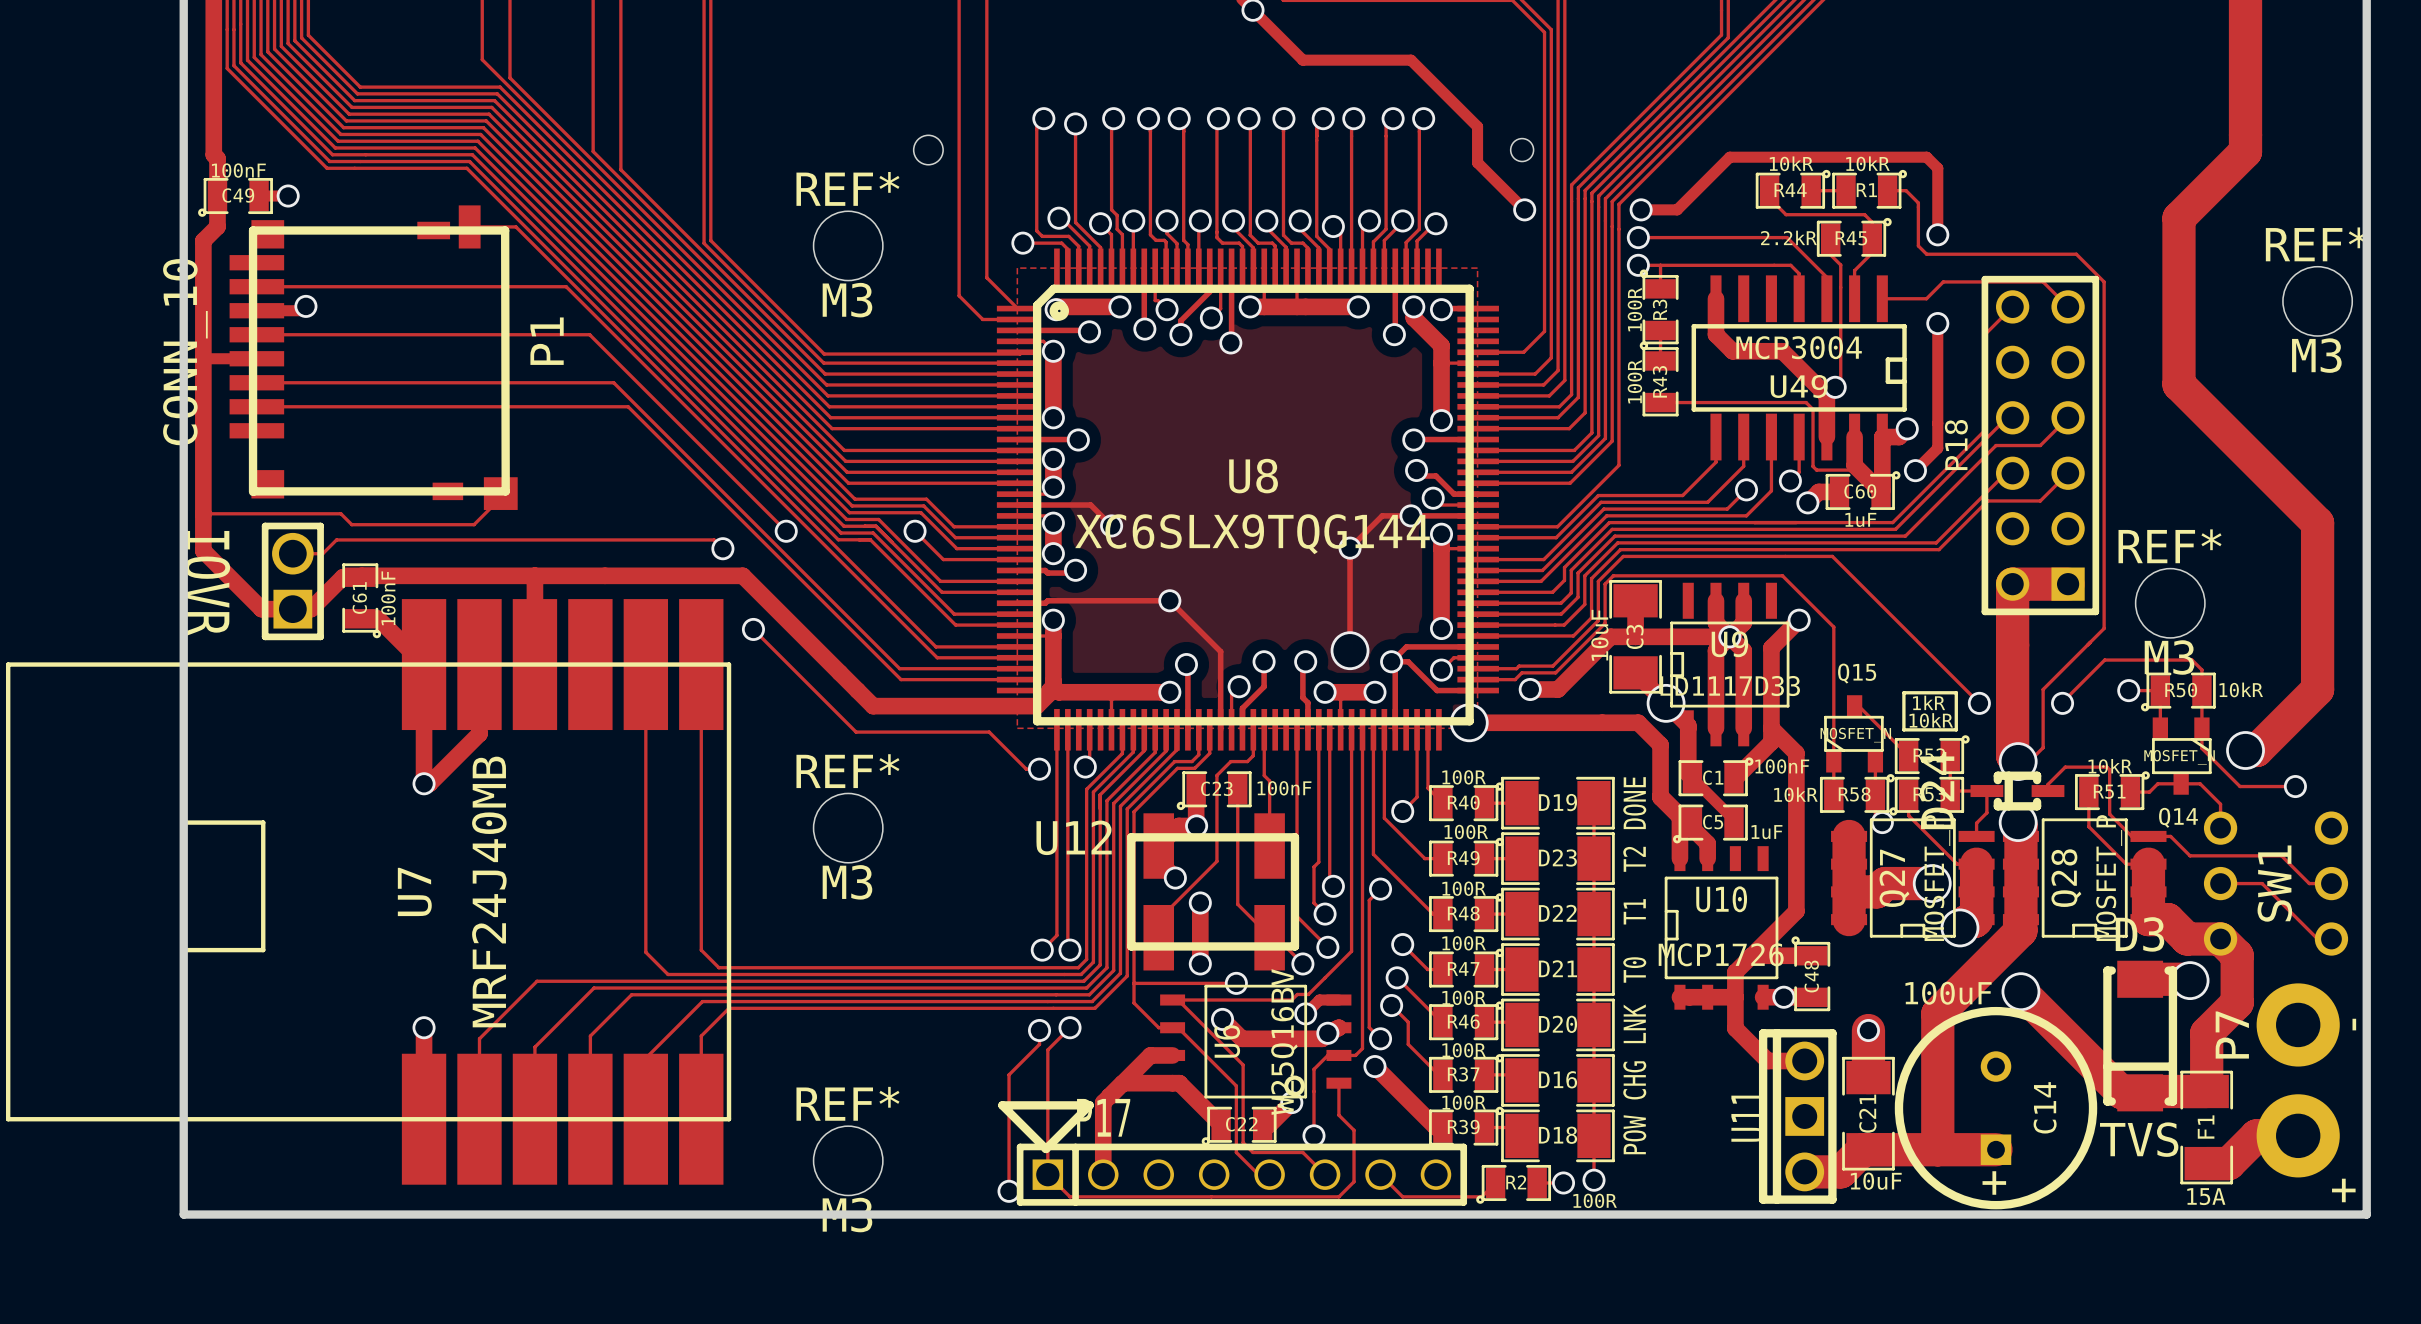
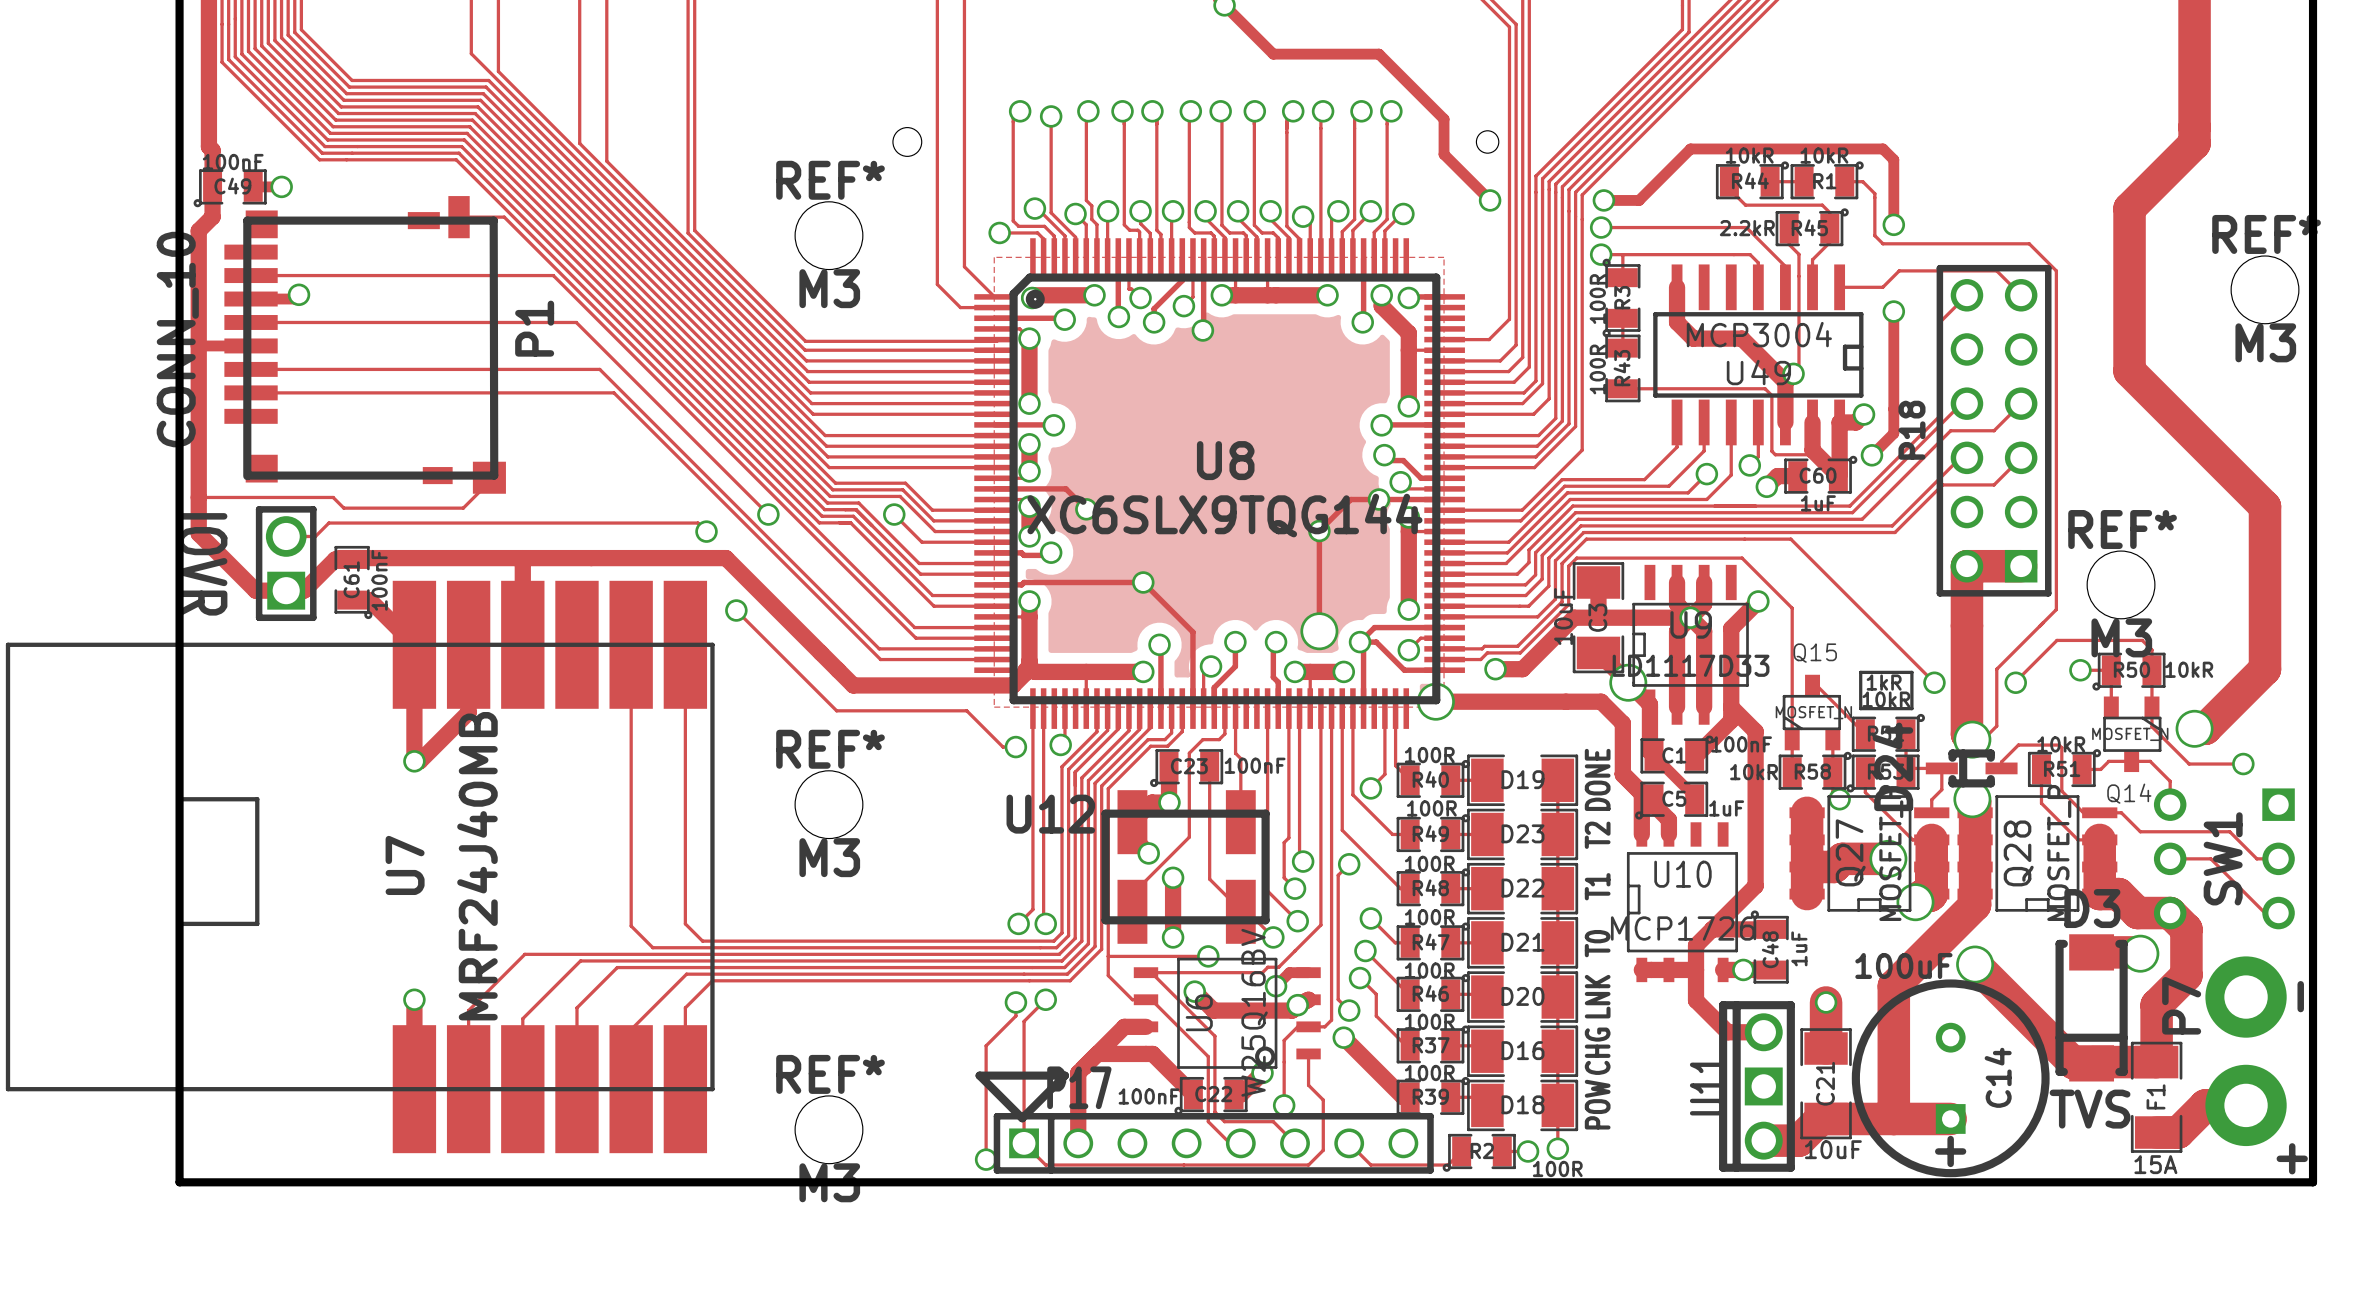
SW1 footprint: [2203, 811, 2349, 956] -> [2153, 788, 2295, 930]
C48 value: none -> 1uF (1799, 948)
C22 value: none -> 100nF (1149, 1096)

